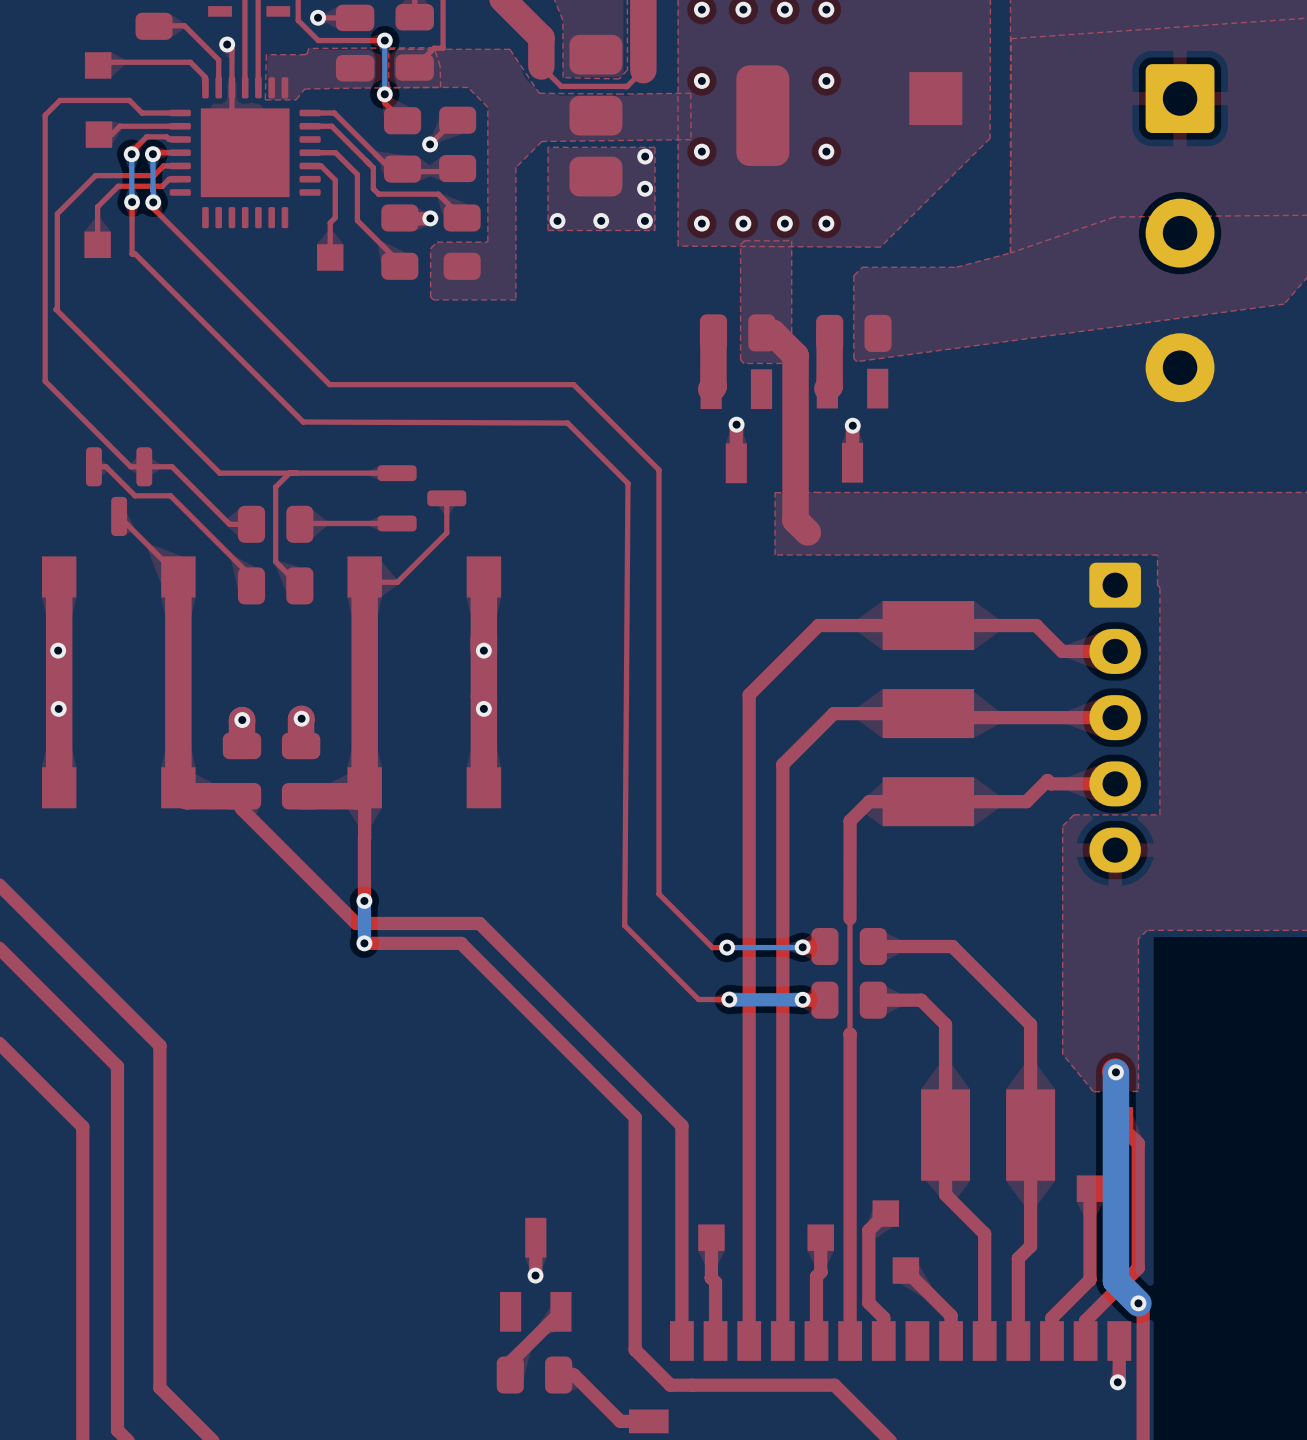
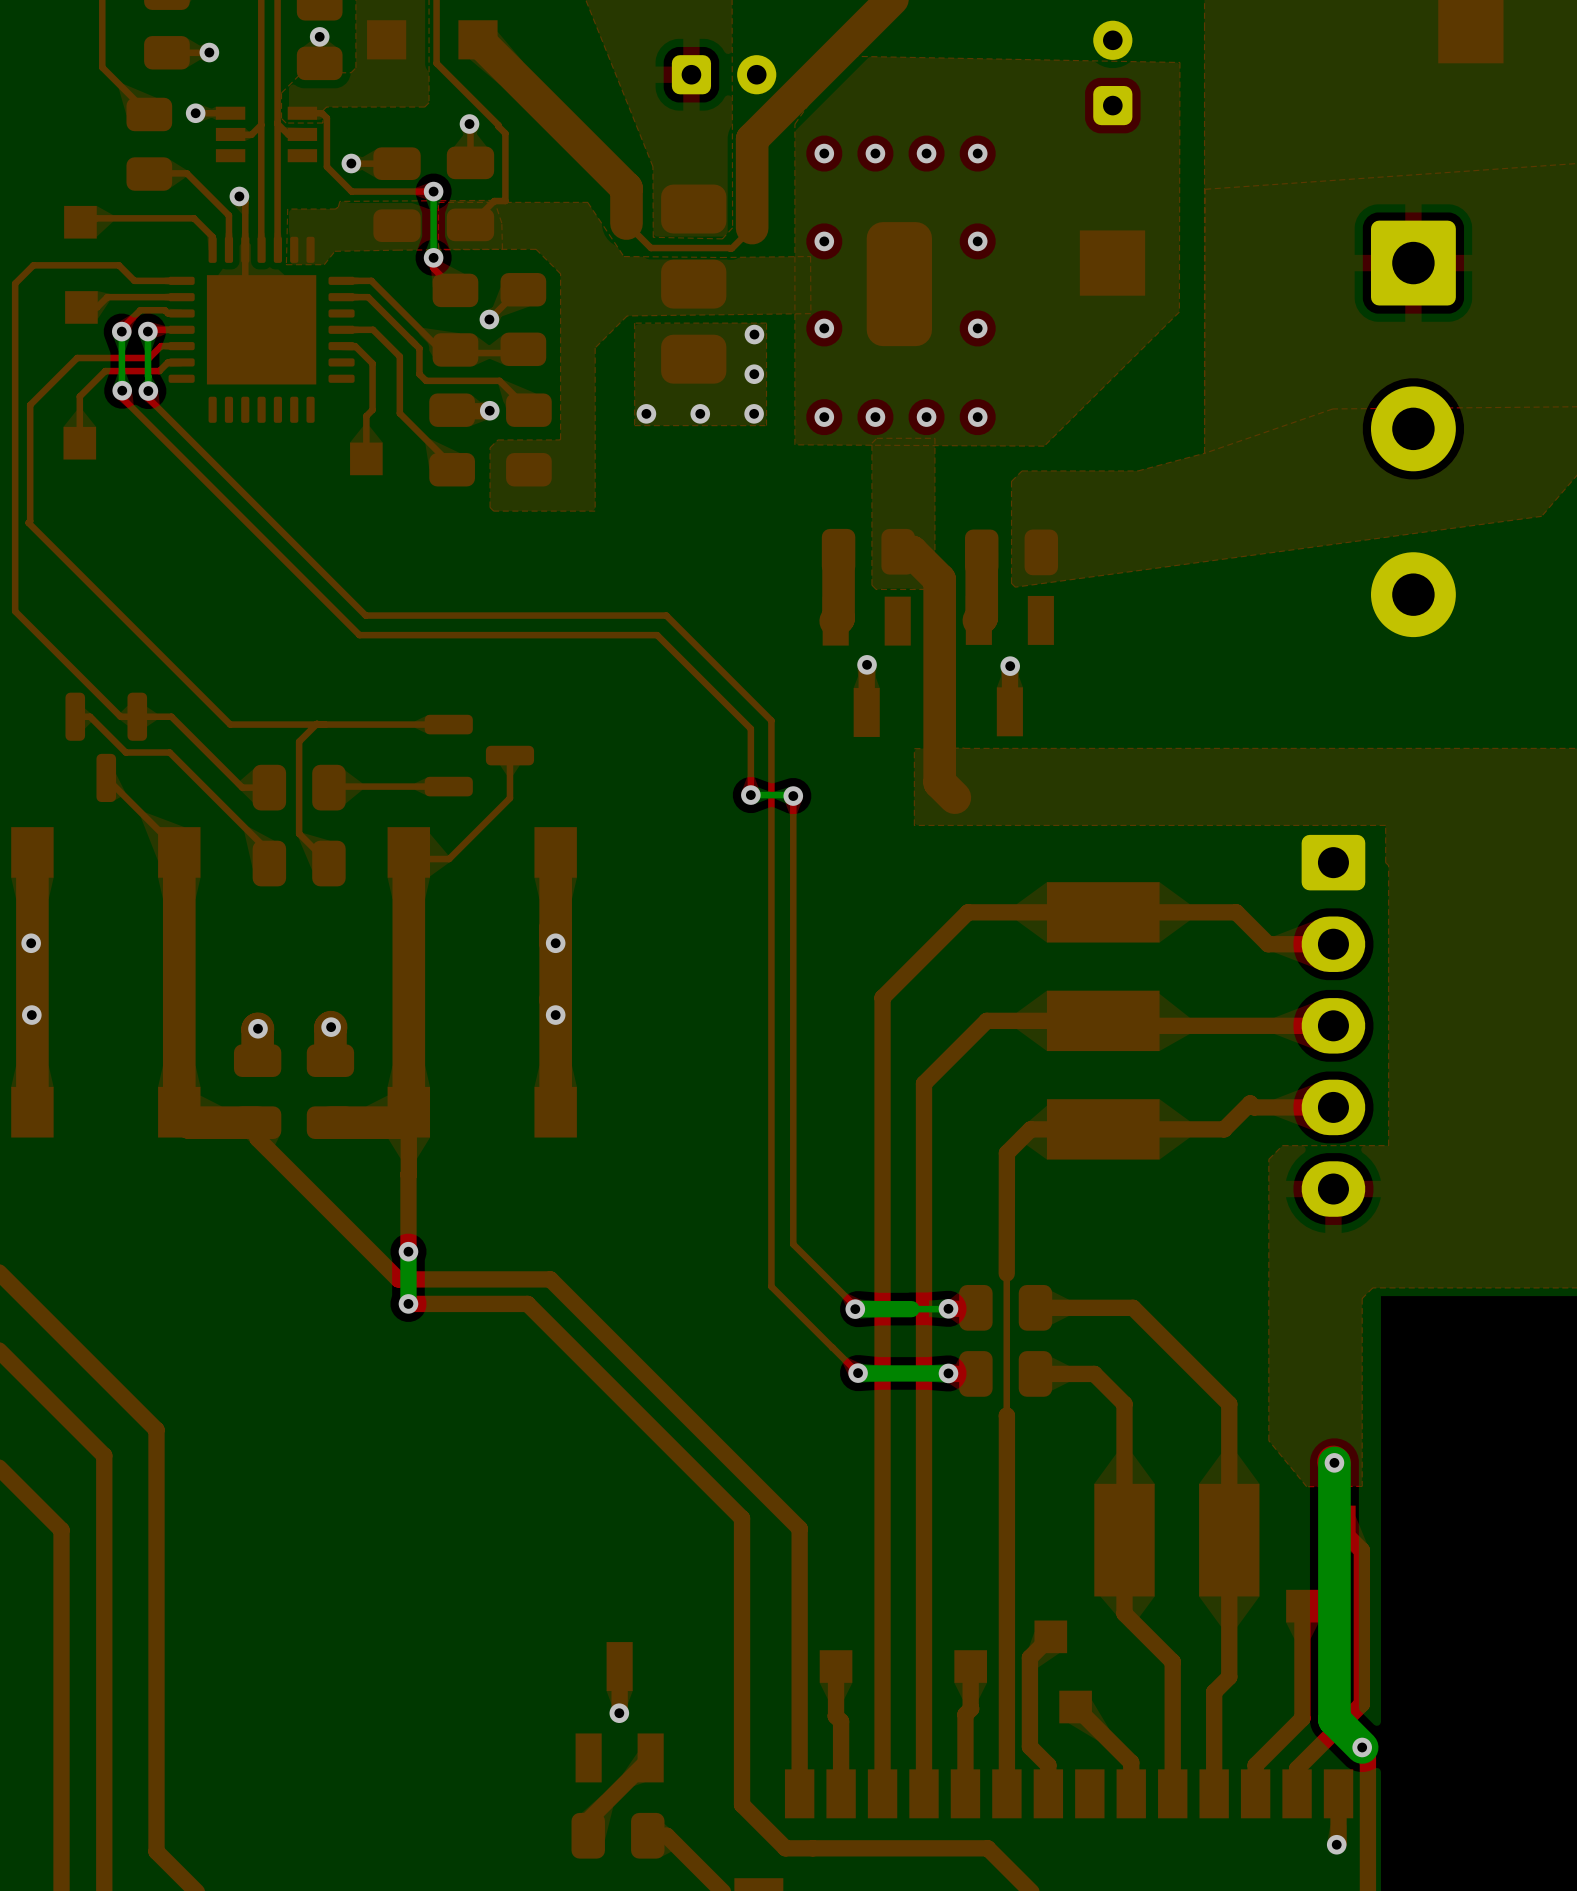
top track: (132, 207) (132, 254) (135, 254) (303, 422) (567, 423) (627, 483) (624, 925) (698, 999) (729, 999) -> (122, 397) (359, 635) (657, 635) (750, 728) (750, 795)
bottom track: none -> (750, 795) (793, 796)
via: none -> (750, 795)
top track: none -> (793, 796) (793, 1244) (858, 1309)
via: none -> (793, 796)
top track: (658, 894) (712, 947) (727, 947) -> (771, 1243) (771, 1286) (832, 1347)
bottom track width: thin (772, 947) (729, 947) -> thick (911, 1309) (858, 1309)
top track: none -> (832, 1347) (858, 1373)

